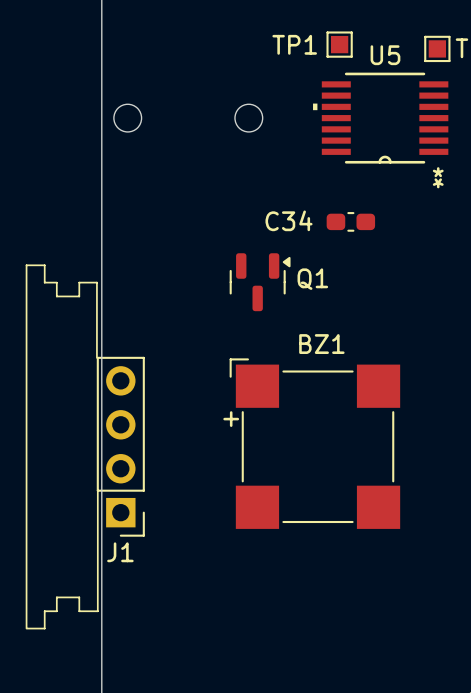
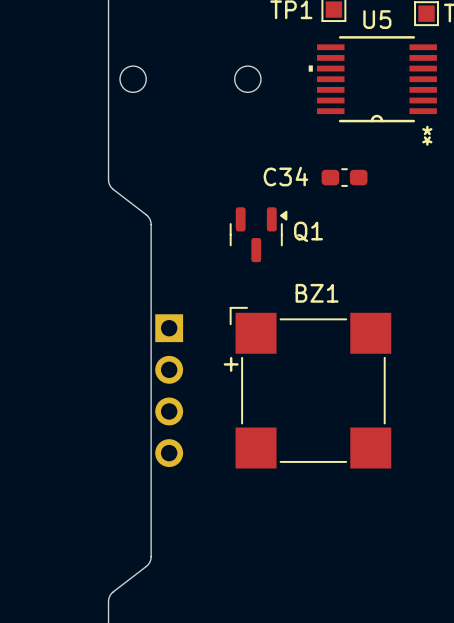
board edge: (101, 224) (101, 669) -> (108, 179) (112, 188) (147, 215) (151, 224) (151, 558) (147, 565) (112, 592) (108, 601)
J1 side: top (85, 446) -> bottom (169, 390)

